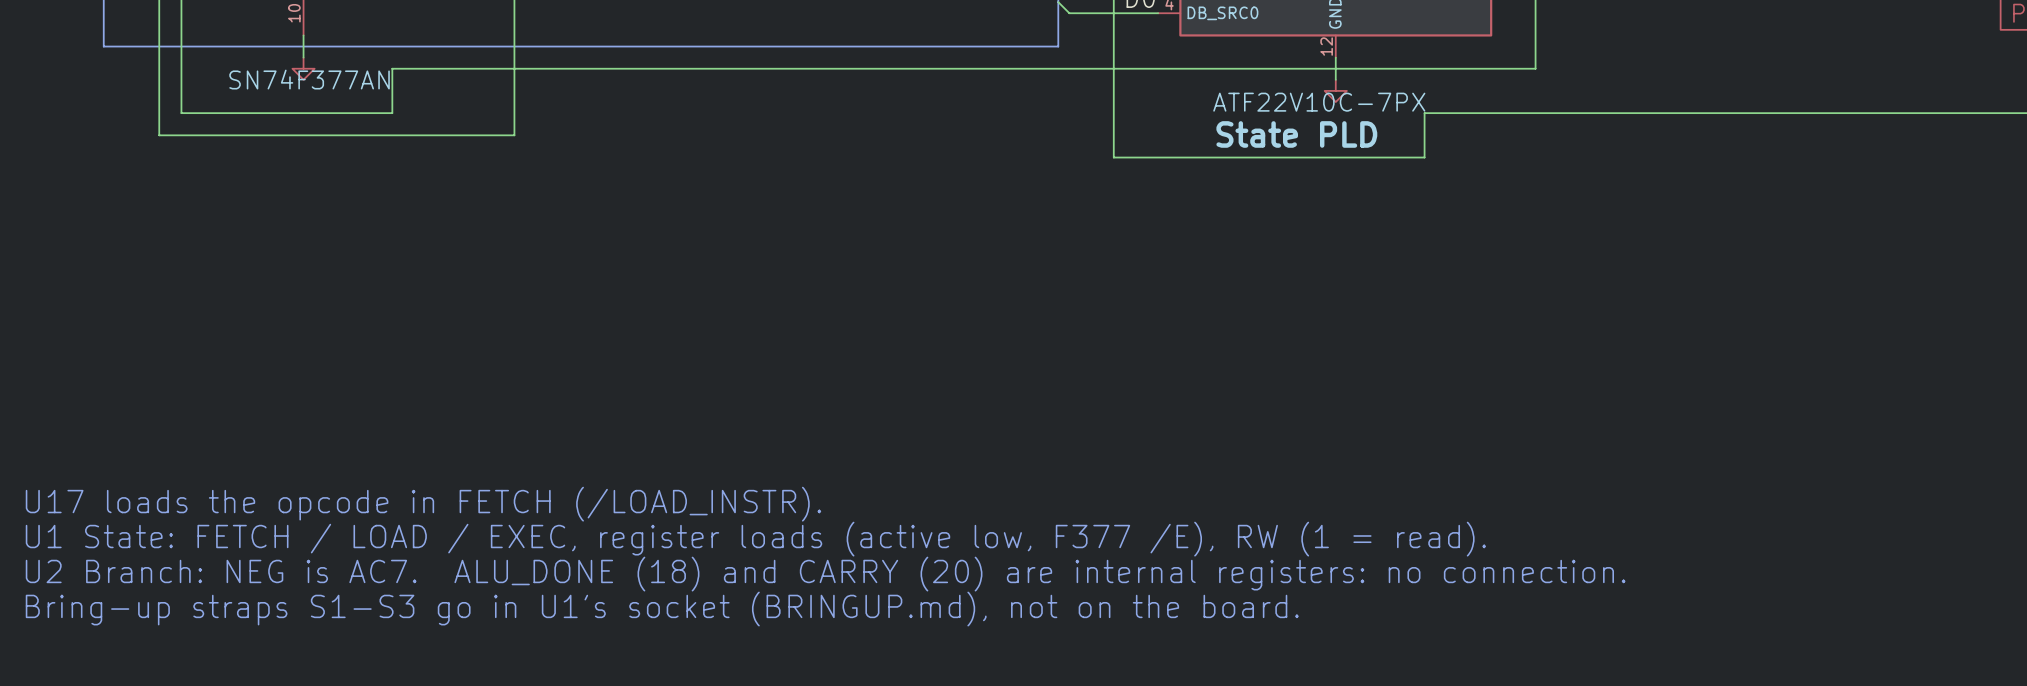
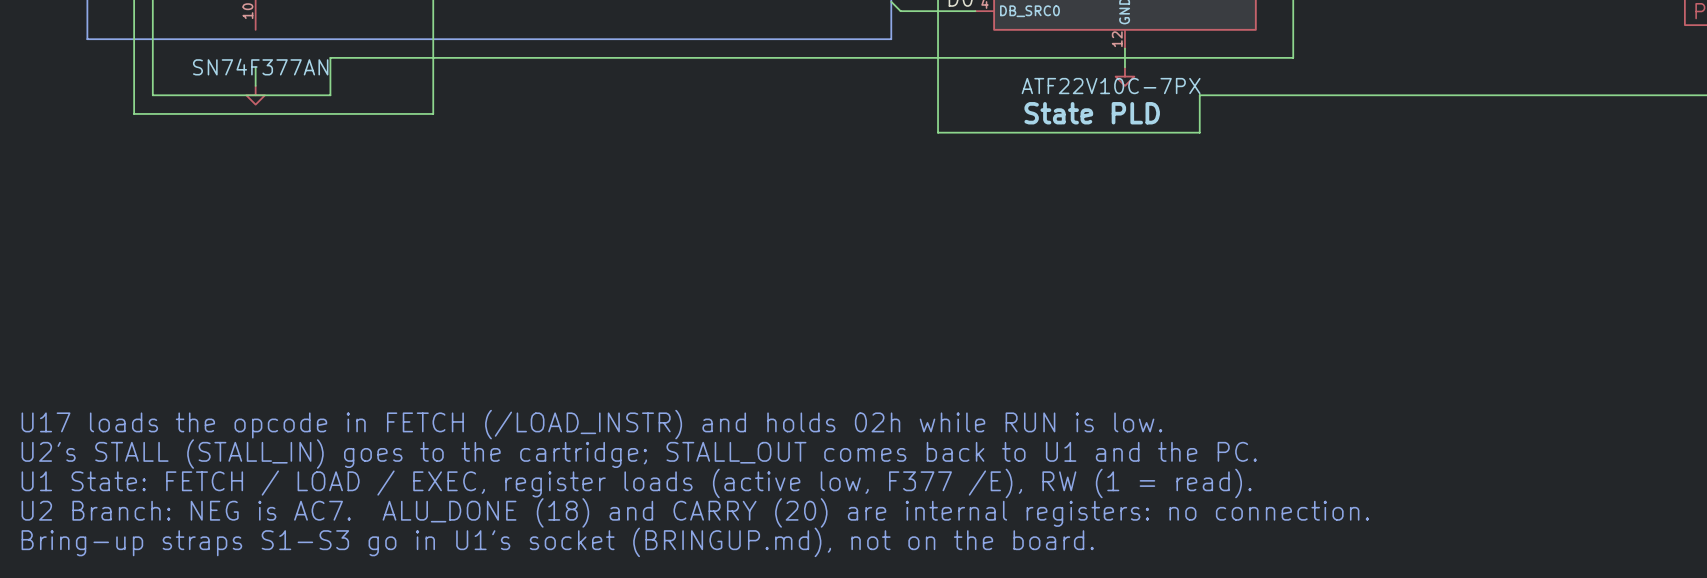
wire: (303, 35) (303, 57) -> (255, 67) (255, 85)
power symbol position: (303, 68) -> (255, 95)
text: U17 loads the opcode in FETCH (/LOAD_INSTR). (423, 504) -> U17 loads the opcode in FETCH (/LOAD_INSTR) and holds 02h while RUN is low. (591, 424)
text: U1 State: FETCH / LOAD / EXEC, register loads (active low, F377 /E), RW (1 = read). (755, 539) -> U2's STALL (STALL_IN) goes to the cartridge; STALL_OUT comes back to U1 and the PC. (639, 454)
text: U2 Branch: NEG is AC7. ALU_DONE (18) and CARRY (20) are internal registers: no connection. (825, 574) -> U1 State: FETCH / LOAD / EXEC, register loads (active low, F377 /E), RW (1 = read). (636, 483)
text: Bring-up straps S1-S3 go in U1's socket (BRINGUP.md), not on the board. (662, 609) -> U2 Branch: NEG is AC7. ALU_DONE (18) and CARRY (20) are internal registers: no connection. (695, 512)
text: none -> Bring-up straps S1-S3 go in U1's socket (BRINGUP.md), not on the board. (557, 542)

